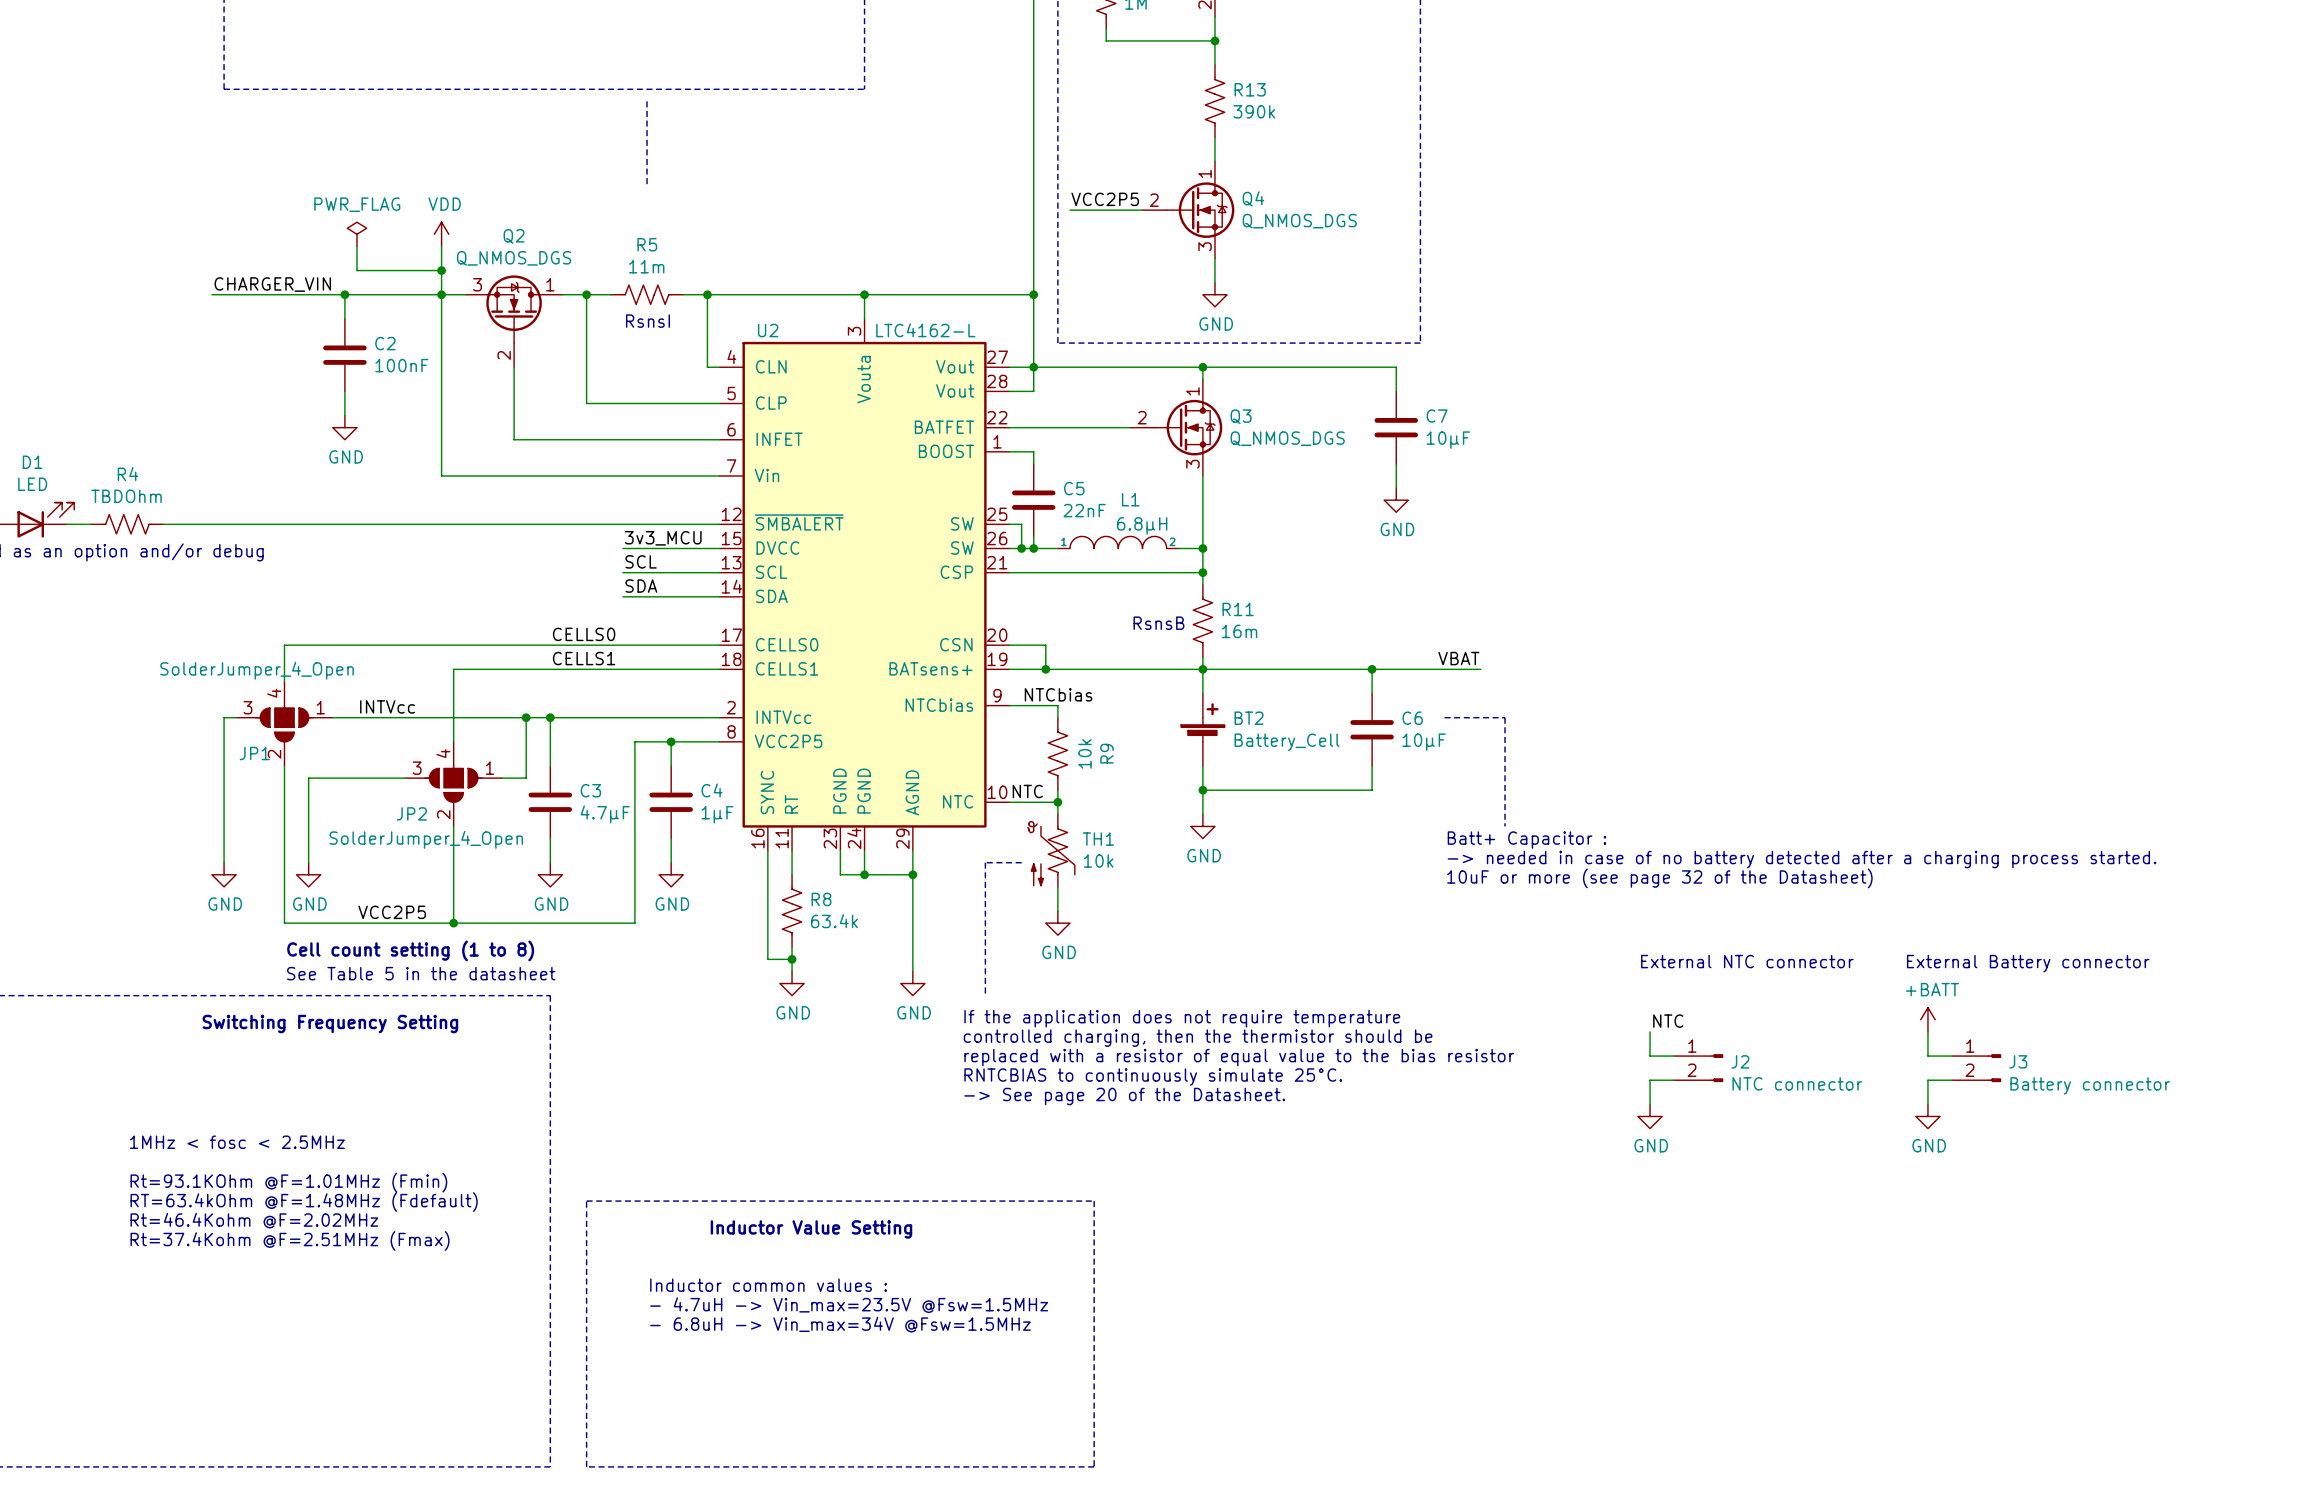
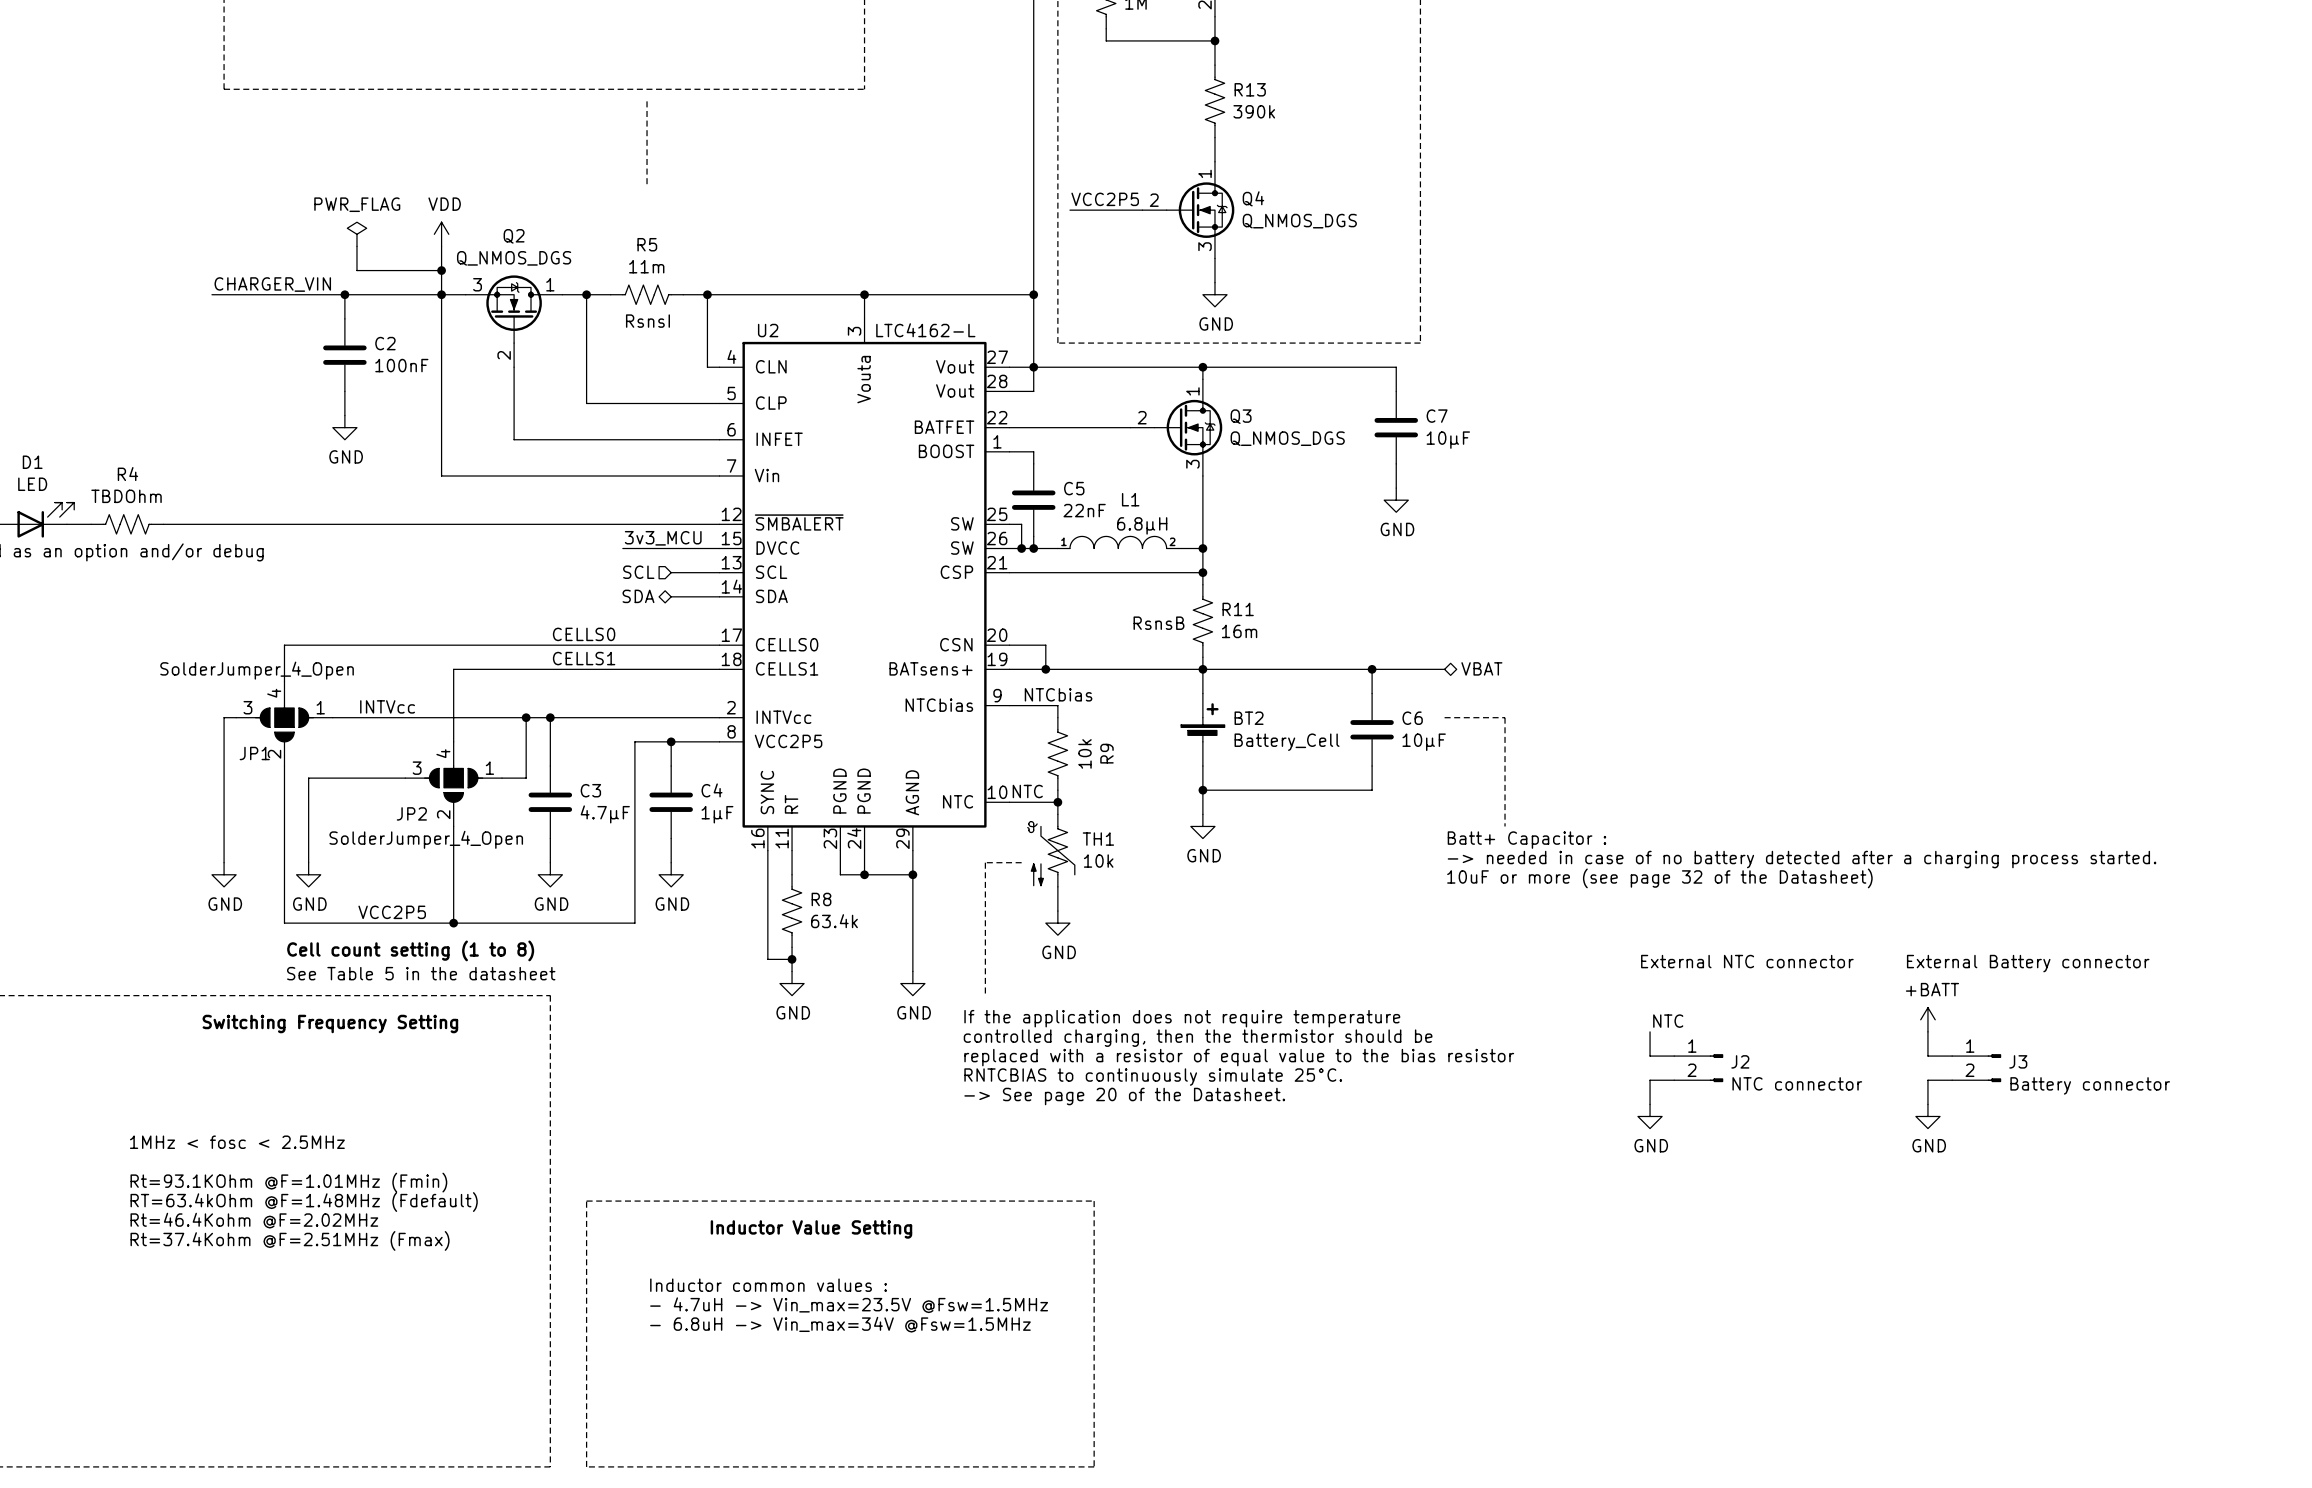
label: SCL (641, 561) -> none
wire: (622, 572) (671, 572) -> none
hierarchical label: none -> SCL (638, 572)
label: SDA (641, 586) -> none
wire: (622, 596) (671, 596) -> none
hierarchical label: none -> SDA (638, 596)
label: VBAT (1458, 658) -> none
hierarchical label: none -> VBAT (1481, 668)
wire: (1444, 669) (1480, 669) -> none

